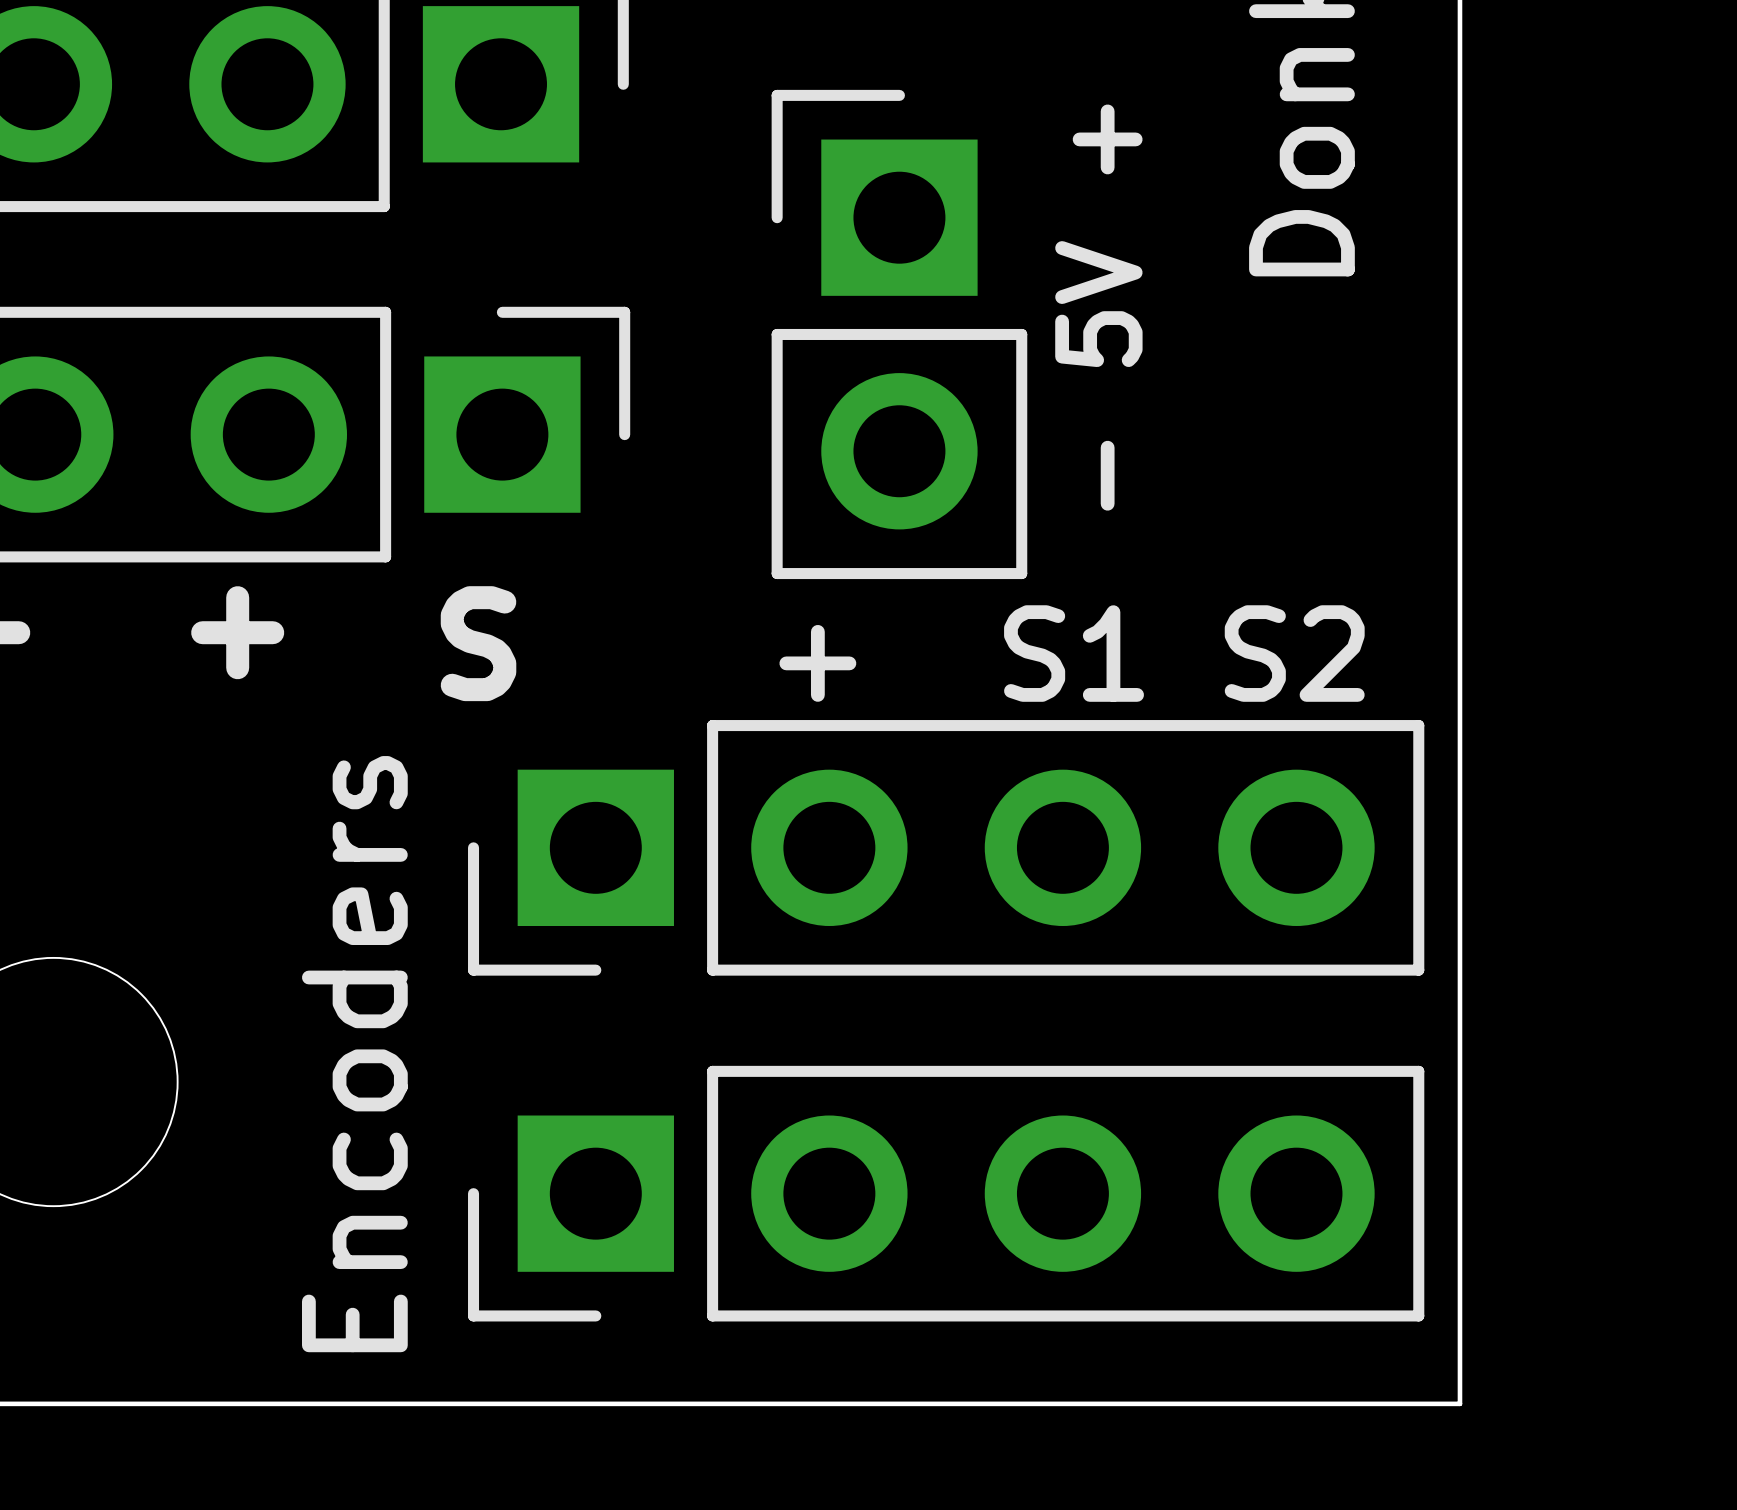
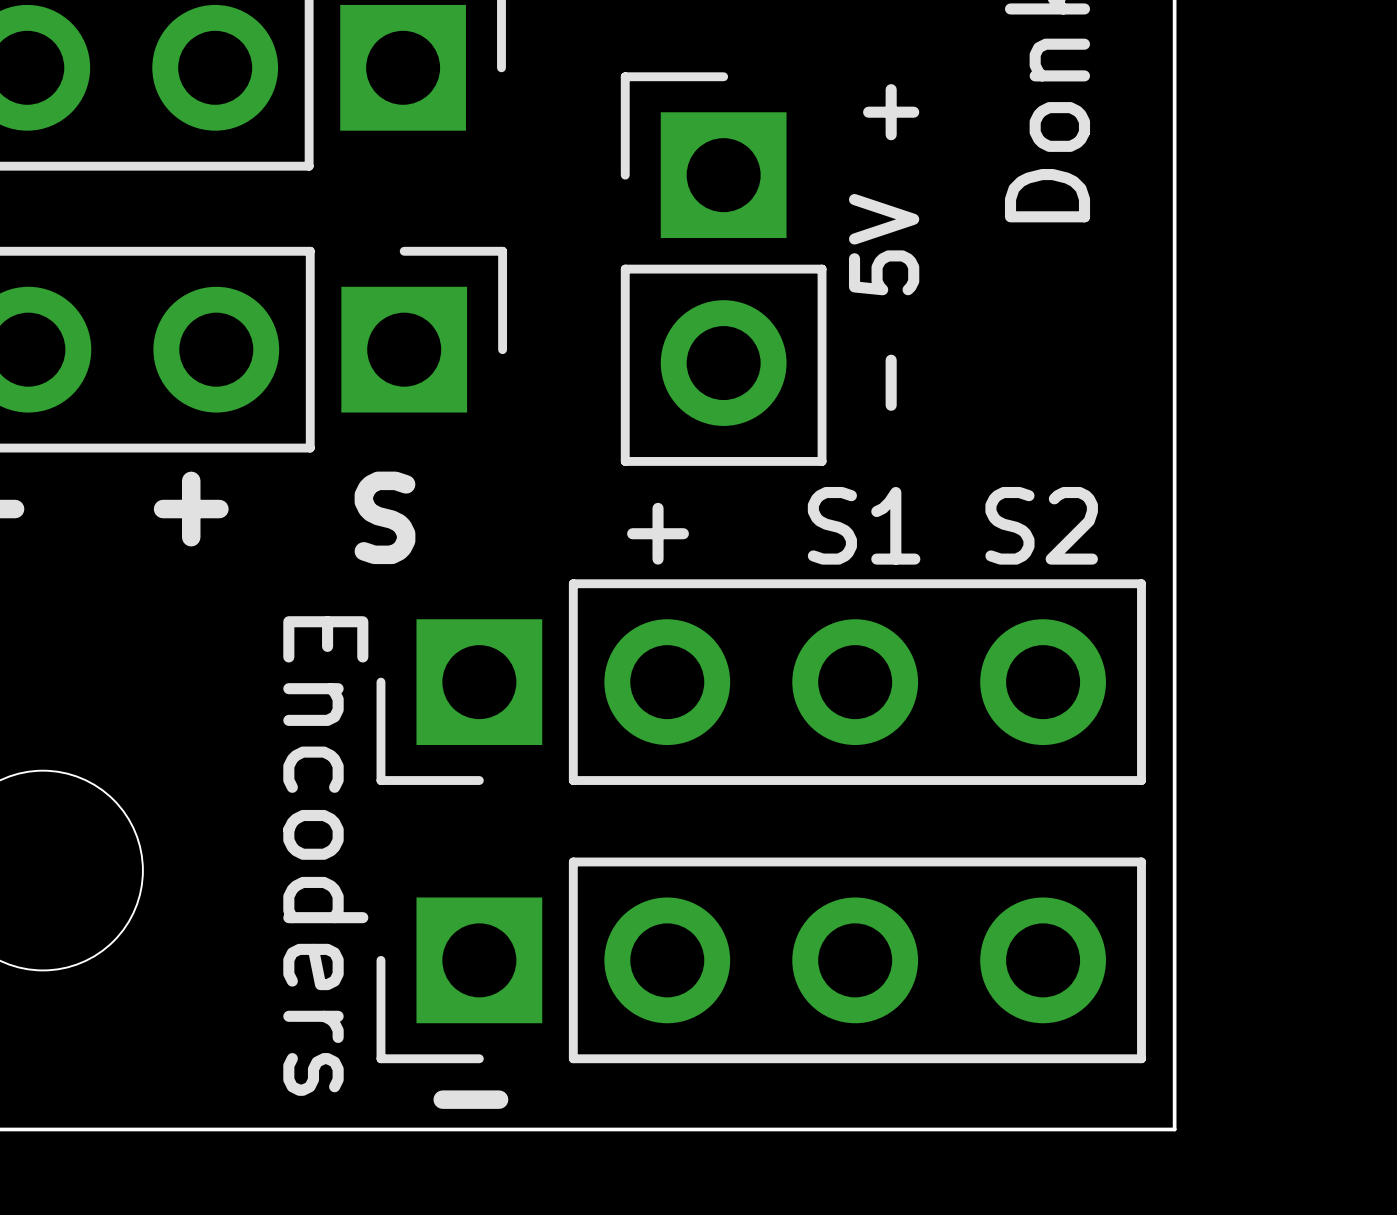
text rotation: 0° (354, 1054) -> 180° (325, 856)
text: none -> - (470, 1099)

